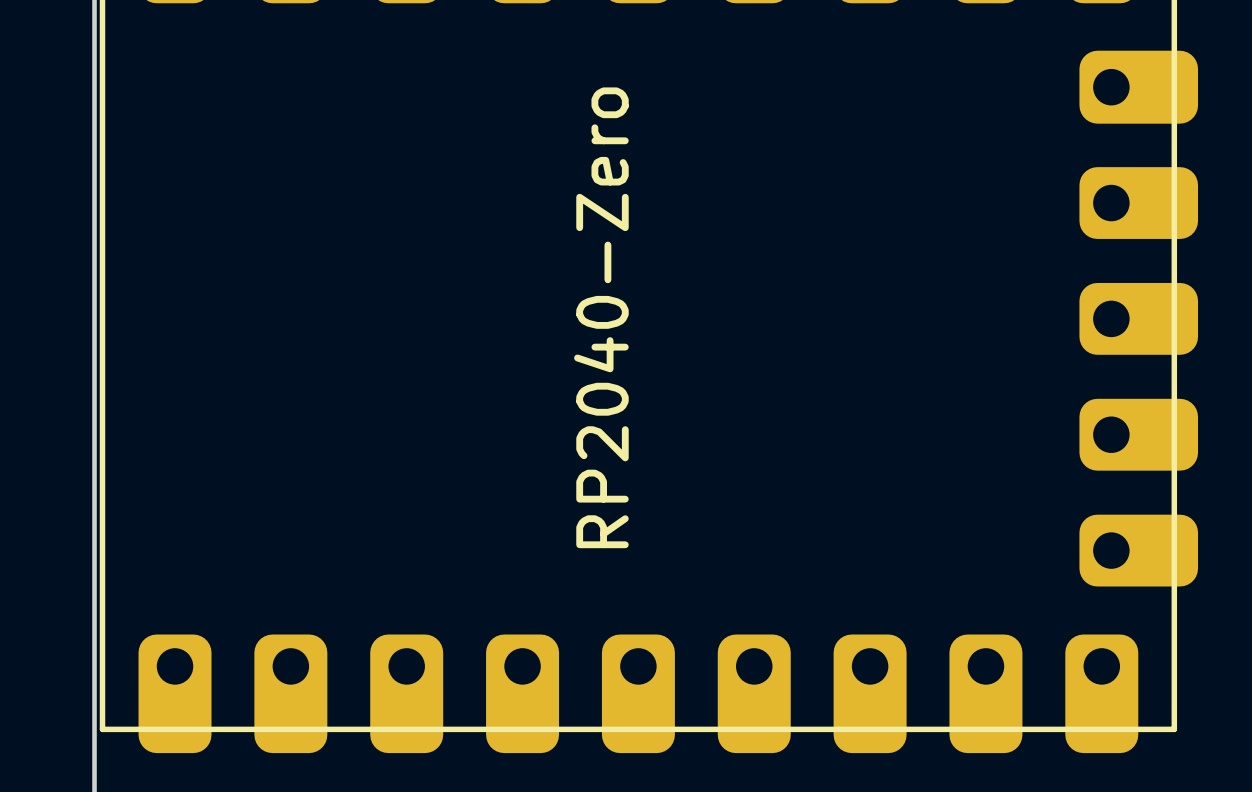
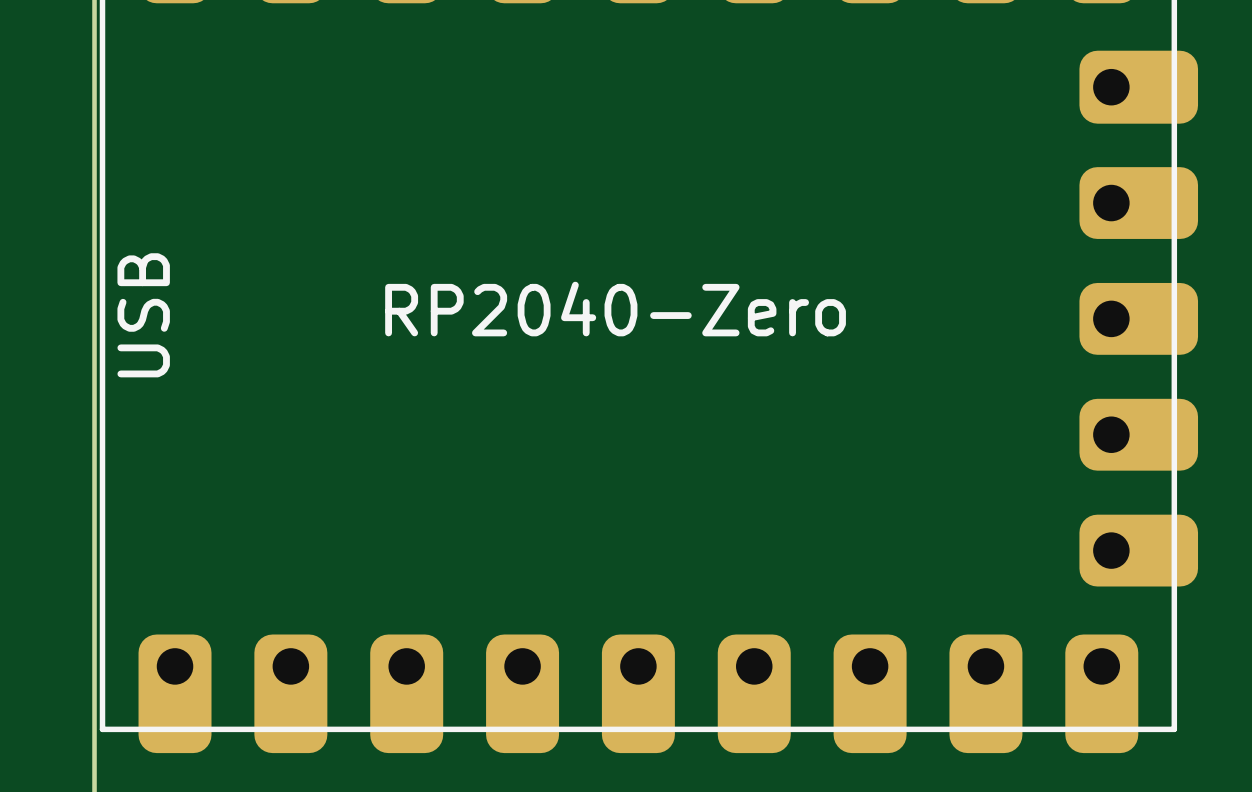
text: none -> USB (143, 315)
part value rotation: 0° (601, 317) -> 90° clockwise (615, 309)

